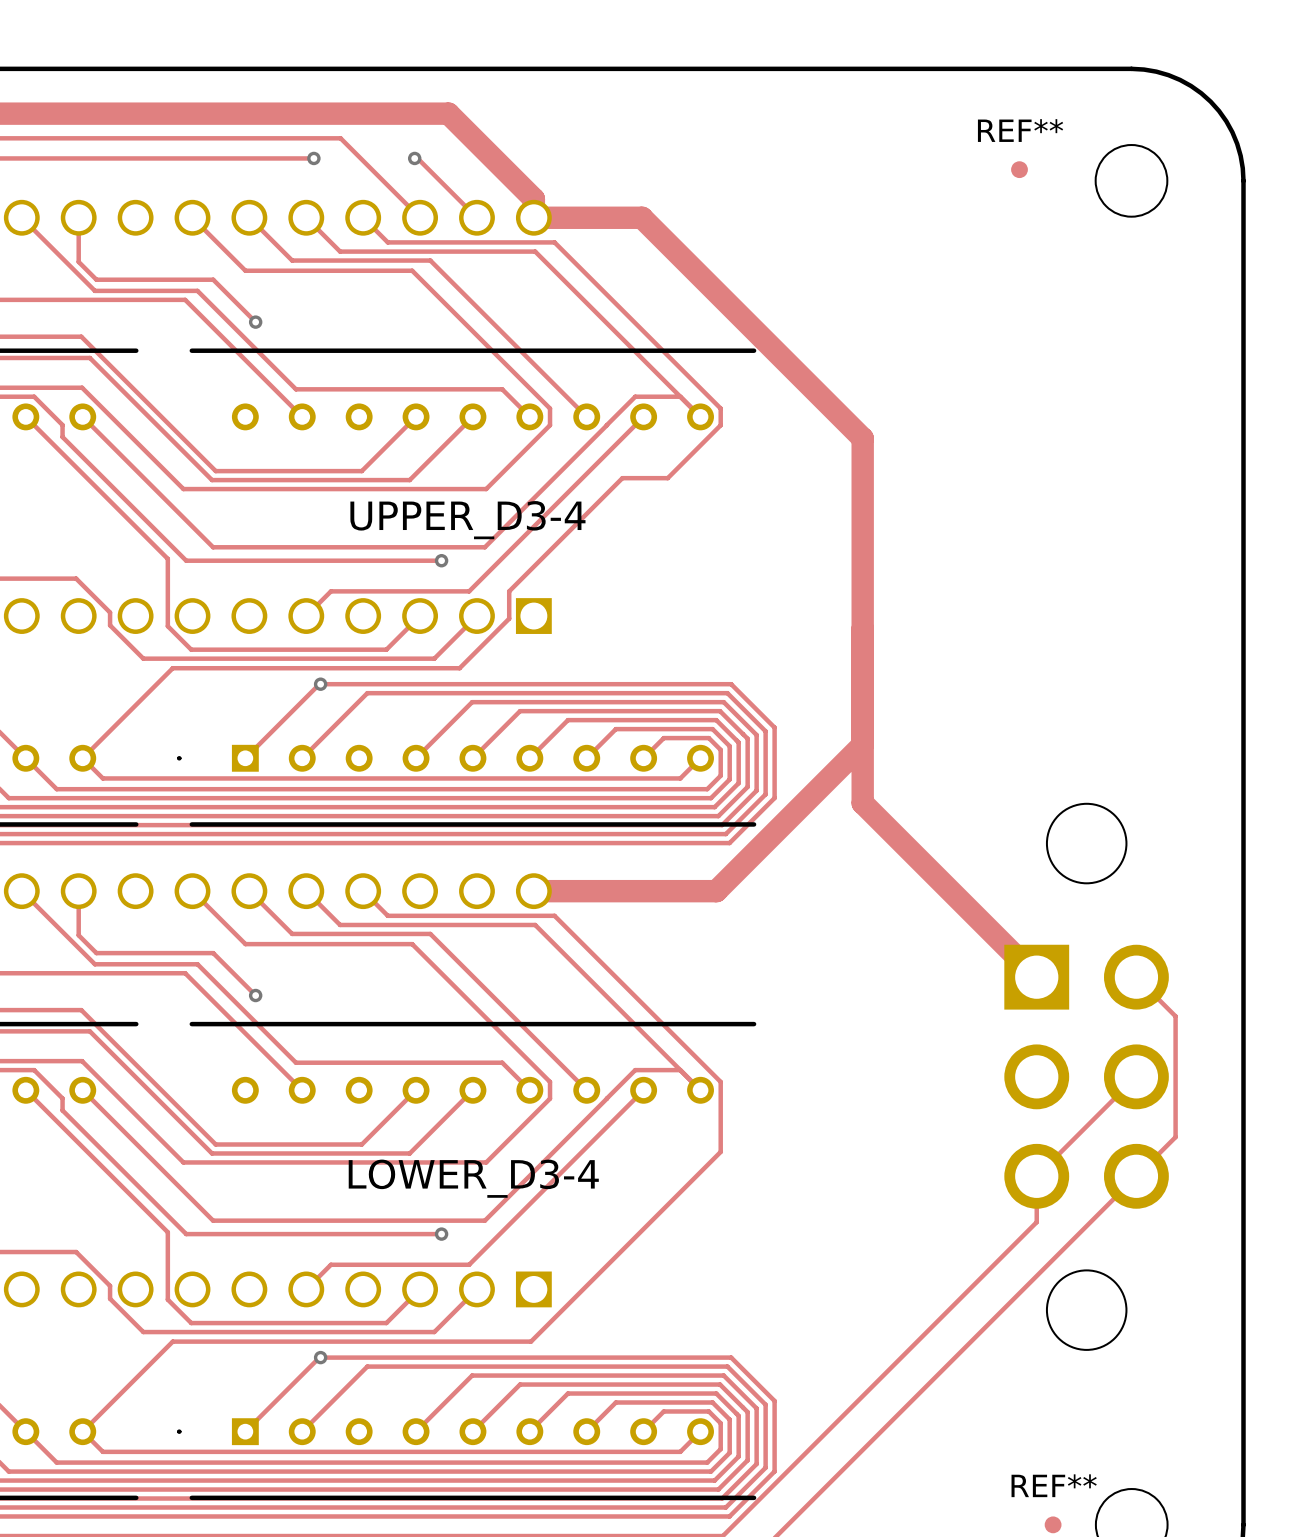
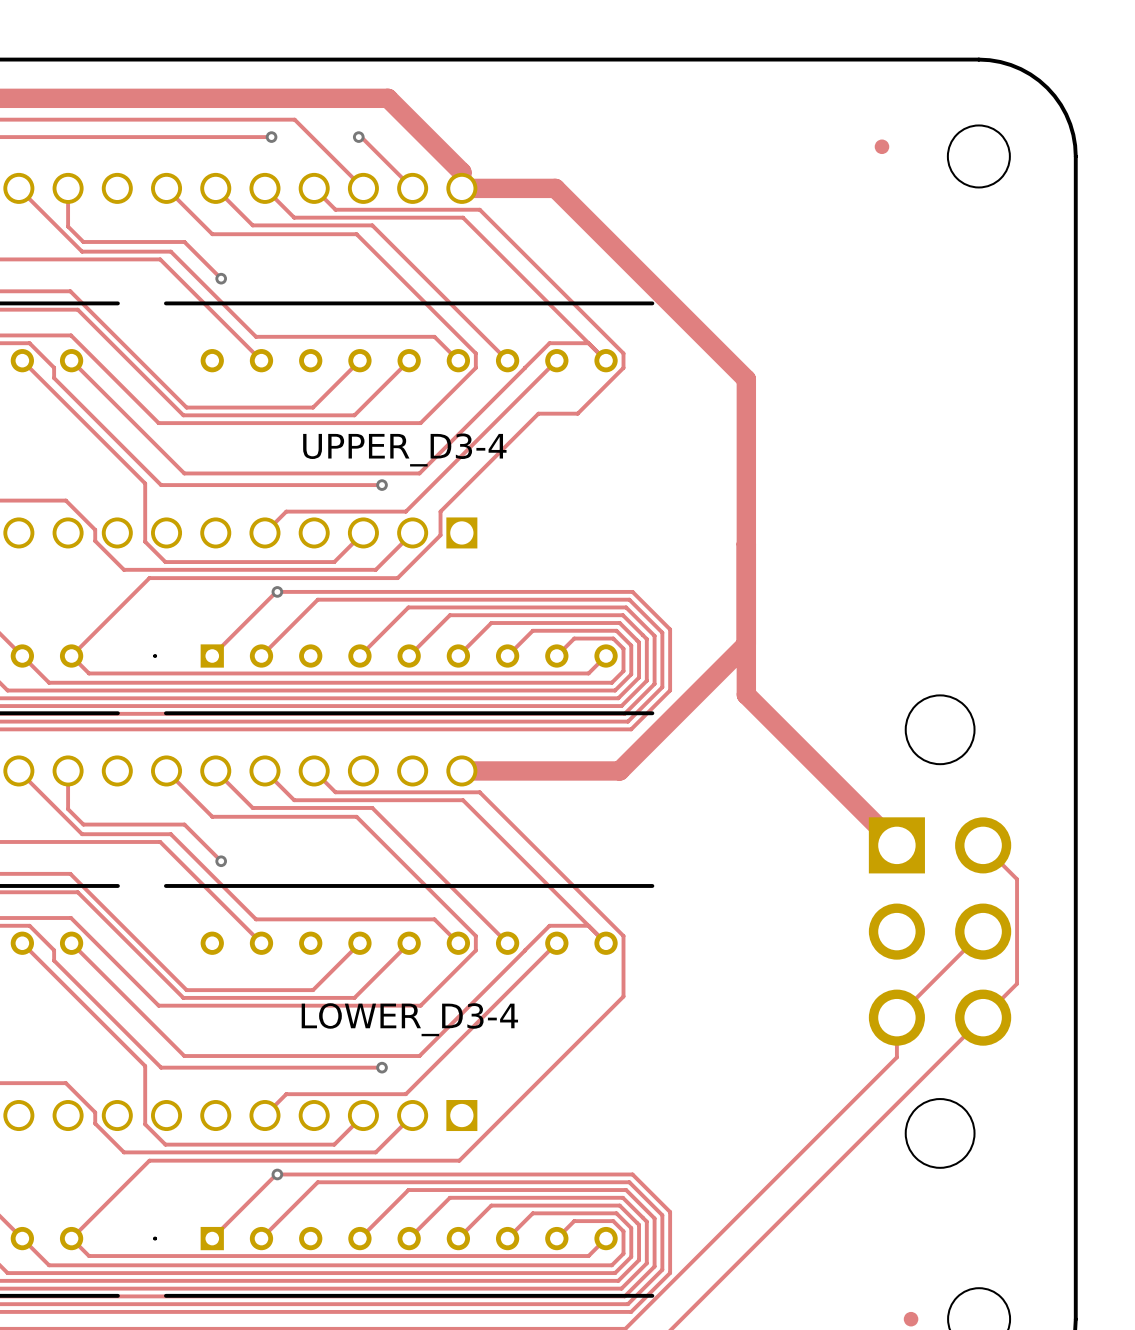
REF** name: REF** (1020, 130) -> none
REF** name: REF** (1054, 1485) -> none

